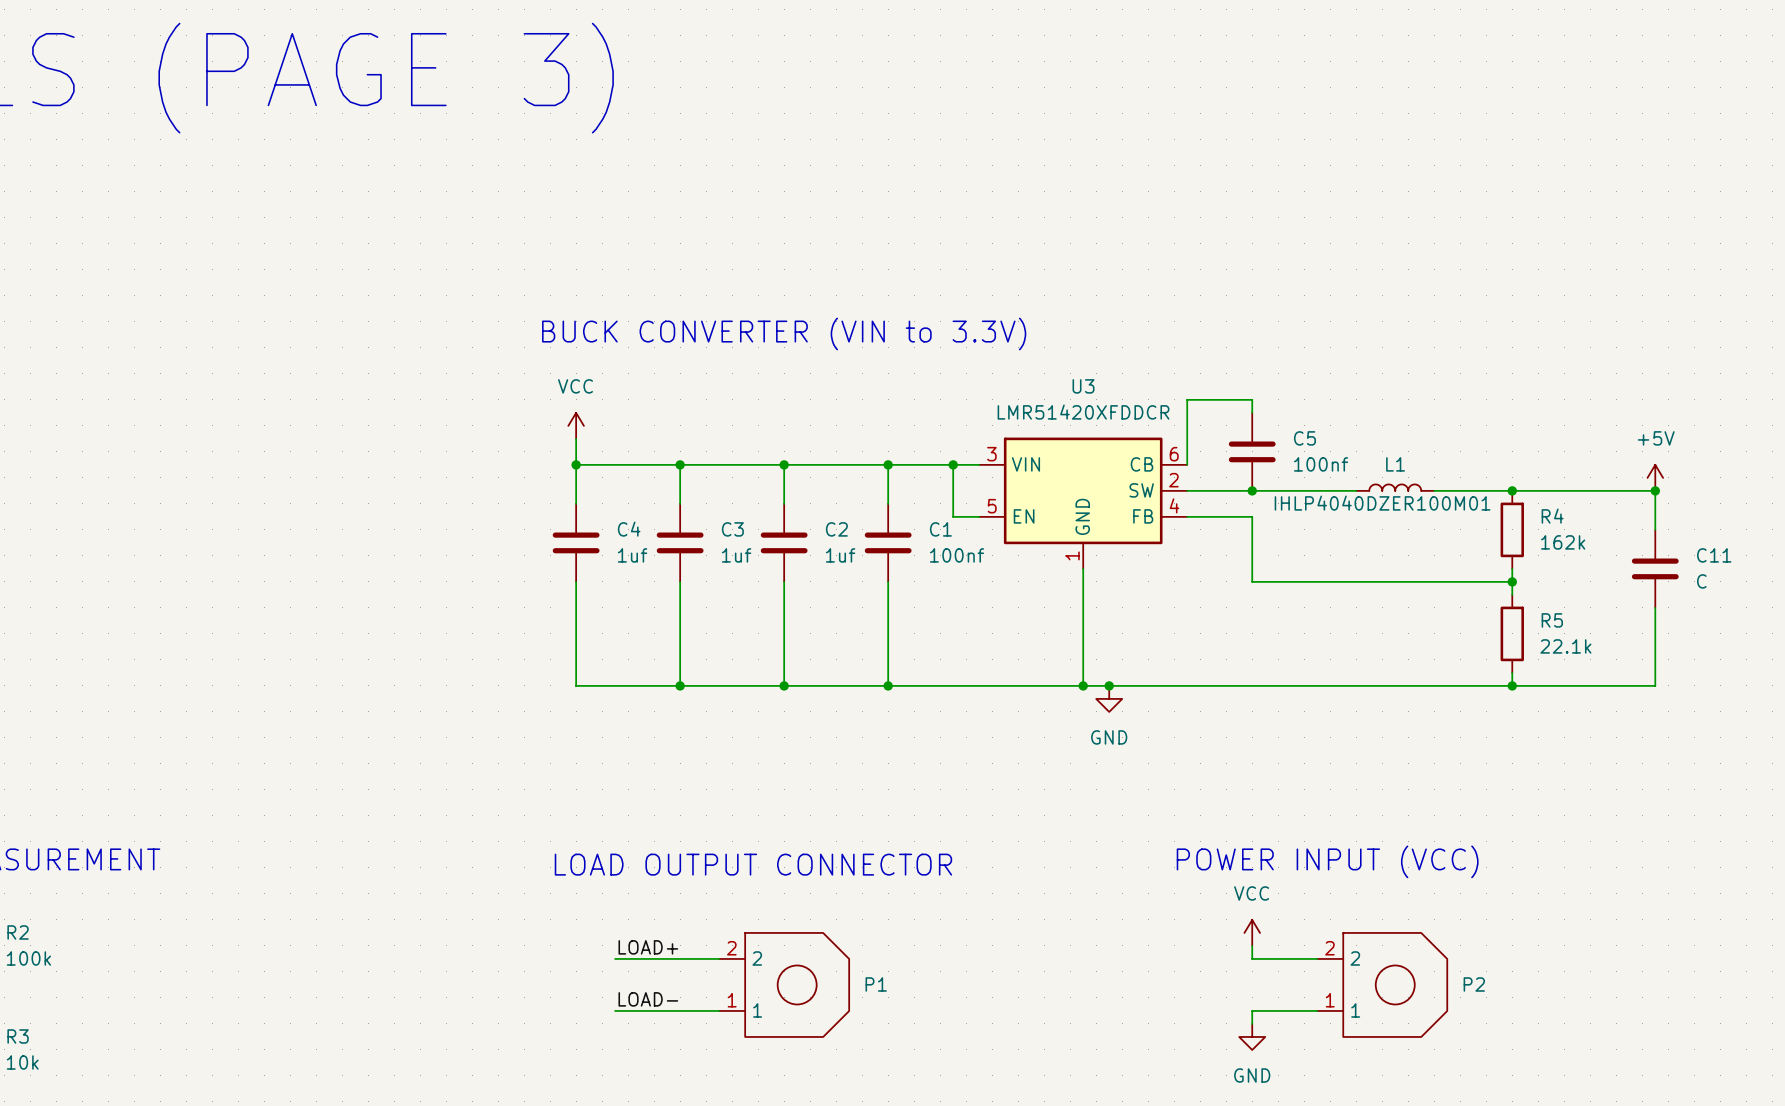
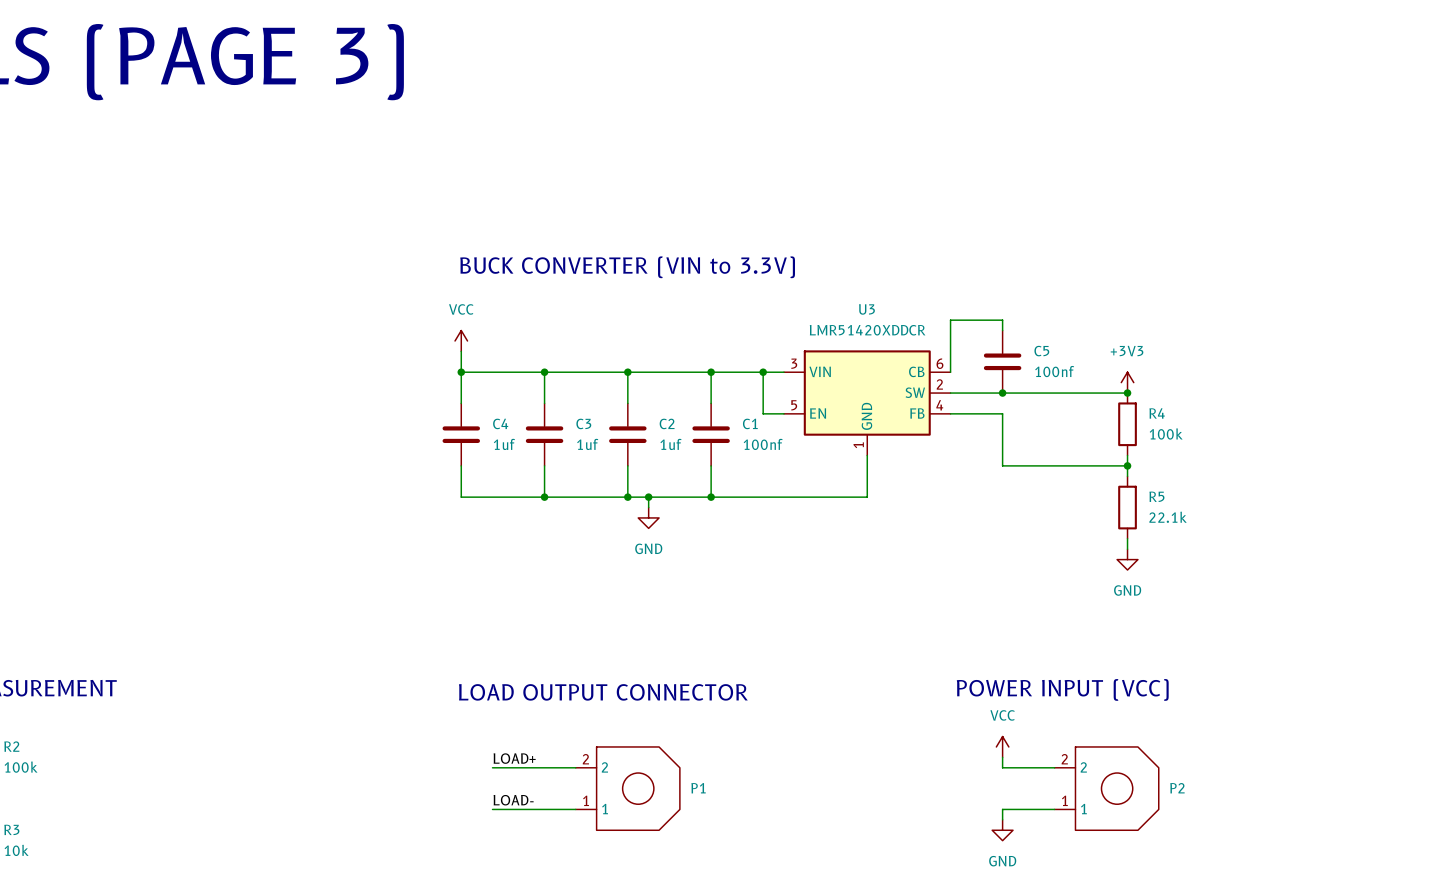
U3 value: LMR51420XFDDCR (1083, 412) -> LMR51420XDDCR (867, 330)
power symbol: none -> +3V3 (1127, 382)
power symbol: +5V (1655, 477) -> none
L1: IHLP4040DZER100M01 (1395, 487) -> none
wire: none -> (1085, 393) (1127, 393)
junction: none -> (1127, 393)
wire: (1434, 490) (1655, 490) (1655, 529) -> none
junction: (1512, 490) -> none
junction: (1655, 490) -> none
R4 position: (1512, 529) -> (1127, 424)
R4 value: 162k (1563, 542) -> 100k (1166, 434)
wire: (1512, 568) (1512, 594) -> (1127, 455) (1127, 476)
C11: C (1655, 568) -> none
wire: (1408, 581) (1512, 581) -> none
junction: none -> (1127, 465)
junction: (1512, 581) -> none
wire: (1655, 607) (1655, 685) (576, 685) (576, 620) -> none
wire: (680, 620) (680, 685) -> none
junction: none -> (544, 497)
wire: (784, 620) (784, 685) -> none
junction: none -> (627, 497)
wire: none -> (648, 497) (648, 507)
junction: none -> (648, 497)
wire: (888, 620) (888, 685) -> none
junction: none -> (711, 497)
wire: (1083, 620) (1083, 685) -> (867, 497) (461, 497)
R5 position: (1512, 633) -> (1127, 507)
power symbol: none -> GND (648, 517)
wire: (1512, 672) (1512, 685) -> (1127, 538) (1127, 549)
junction: (680, 685) -> none
junction: (784, 685) -> none
junction: (888, 685) -> none
junction: (1083, 685) -> none
junction: (1109, 685) -> none
junction: (1512, 685) -> none
power symbol: GND (1109, 698) -> none
power symbol: none -> GND (1127, 559)

